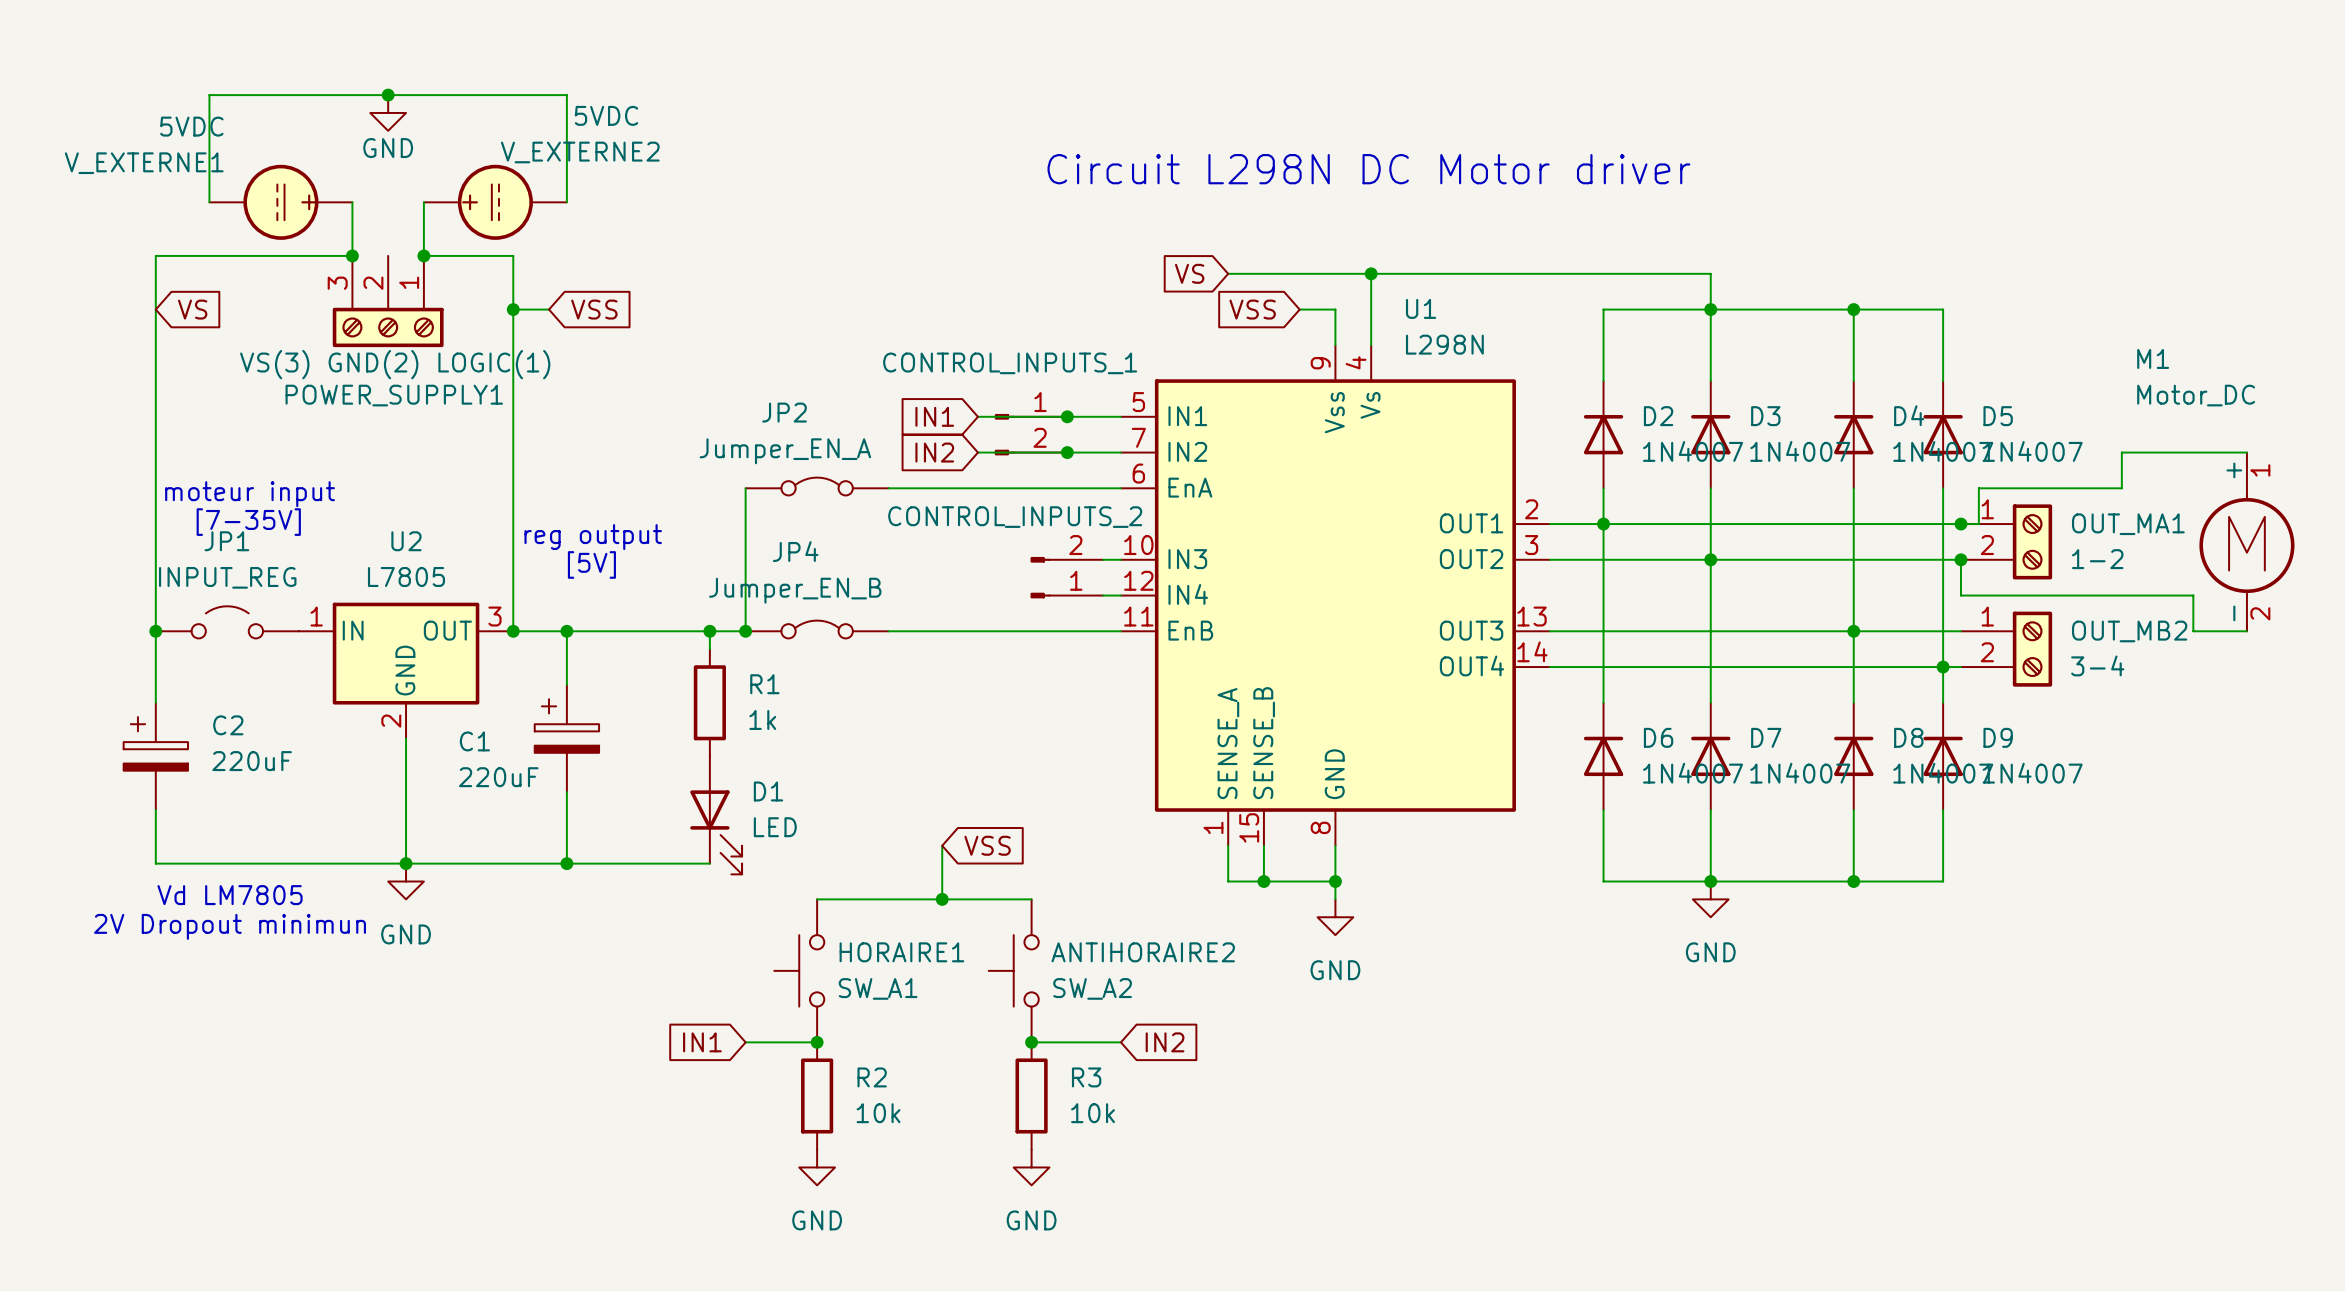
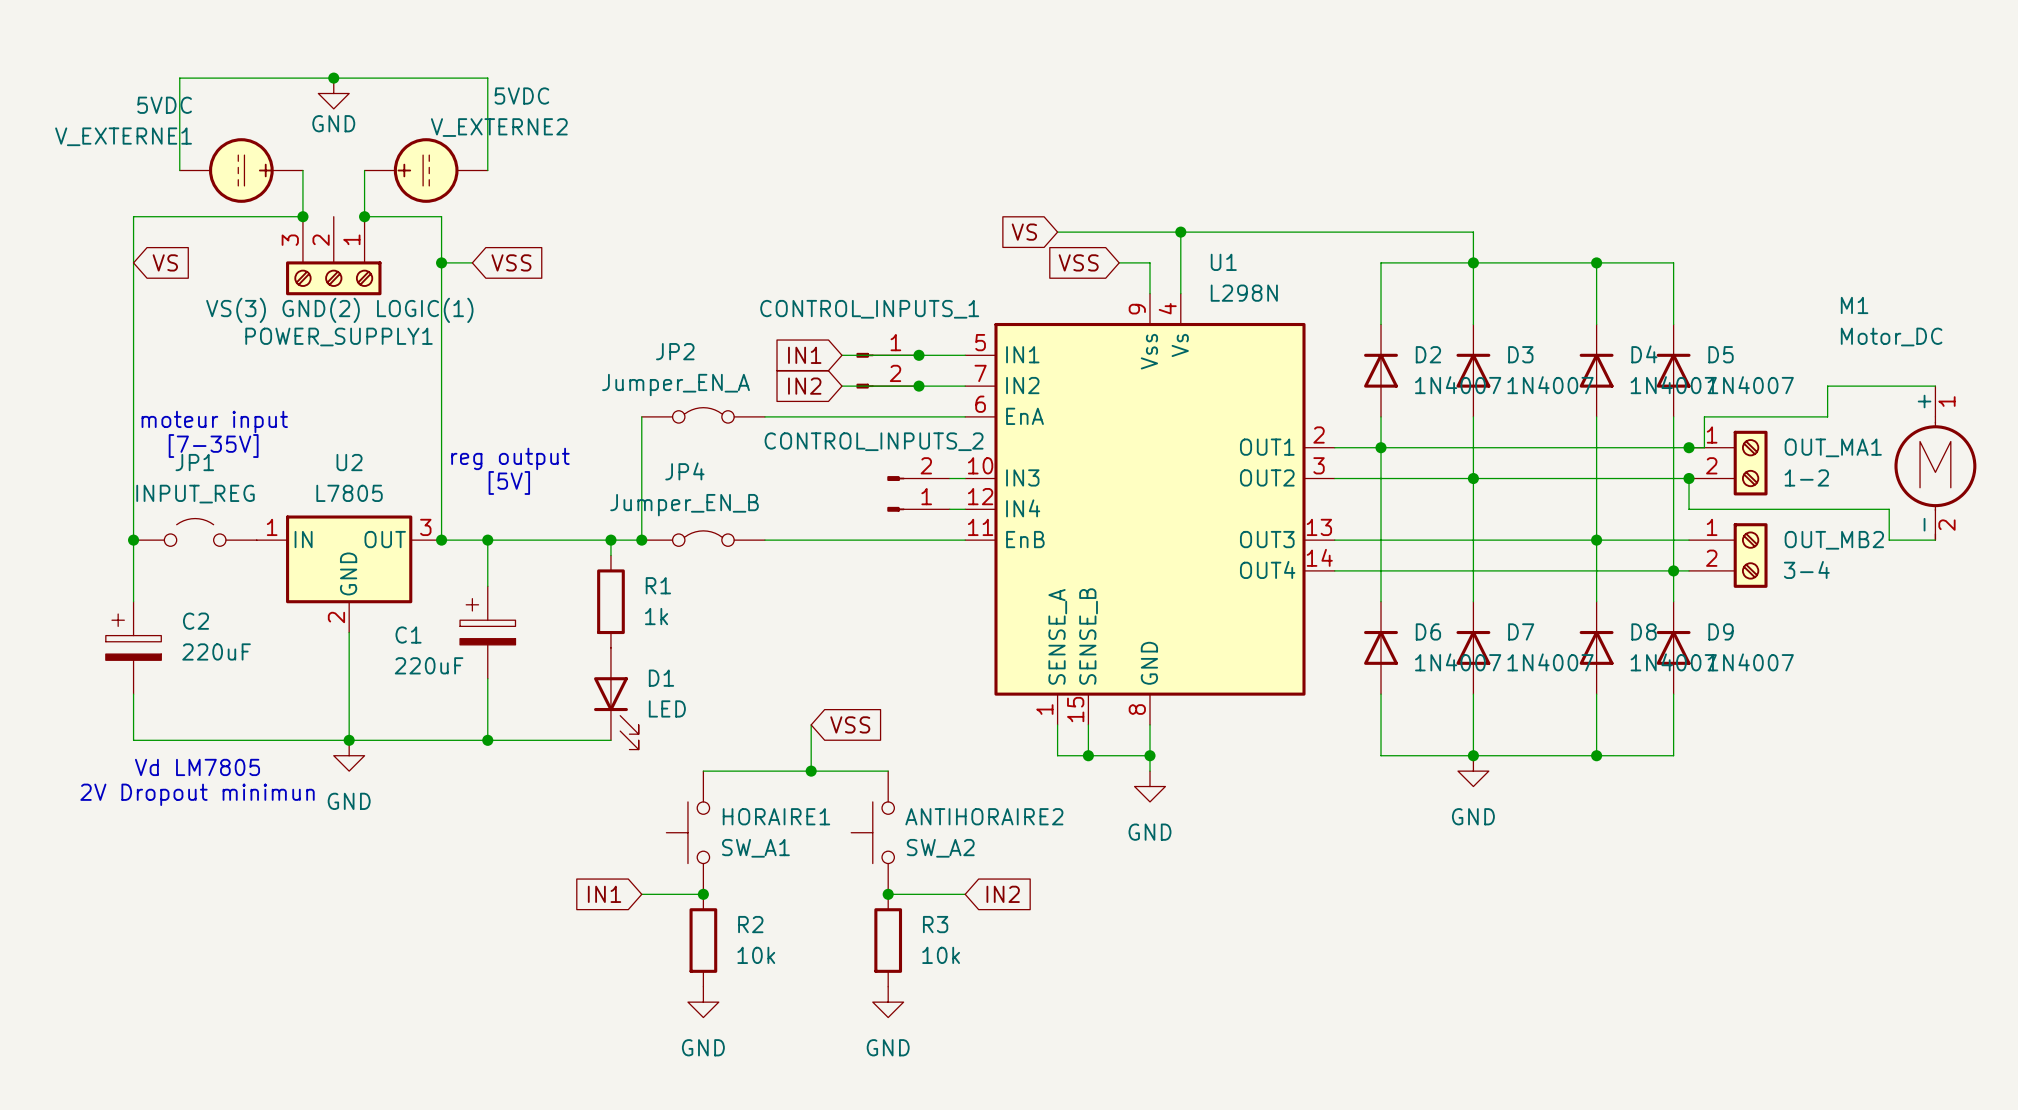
text: Circuit L298N DC Motor driver (1368, 169) -> none

